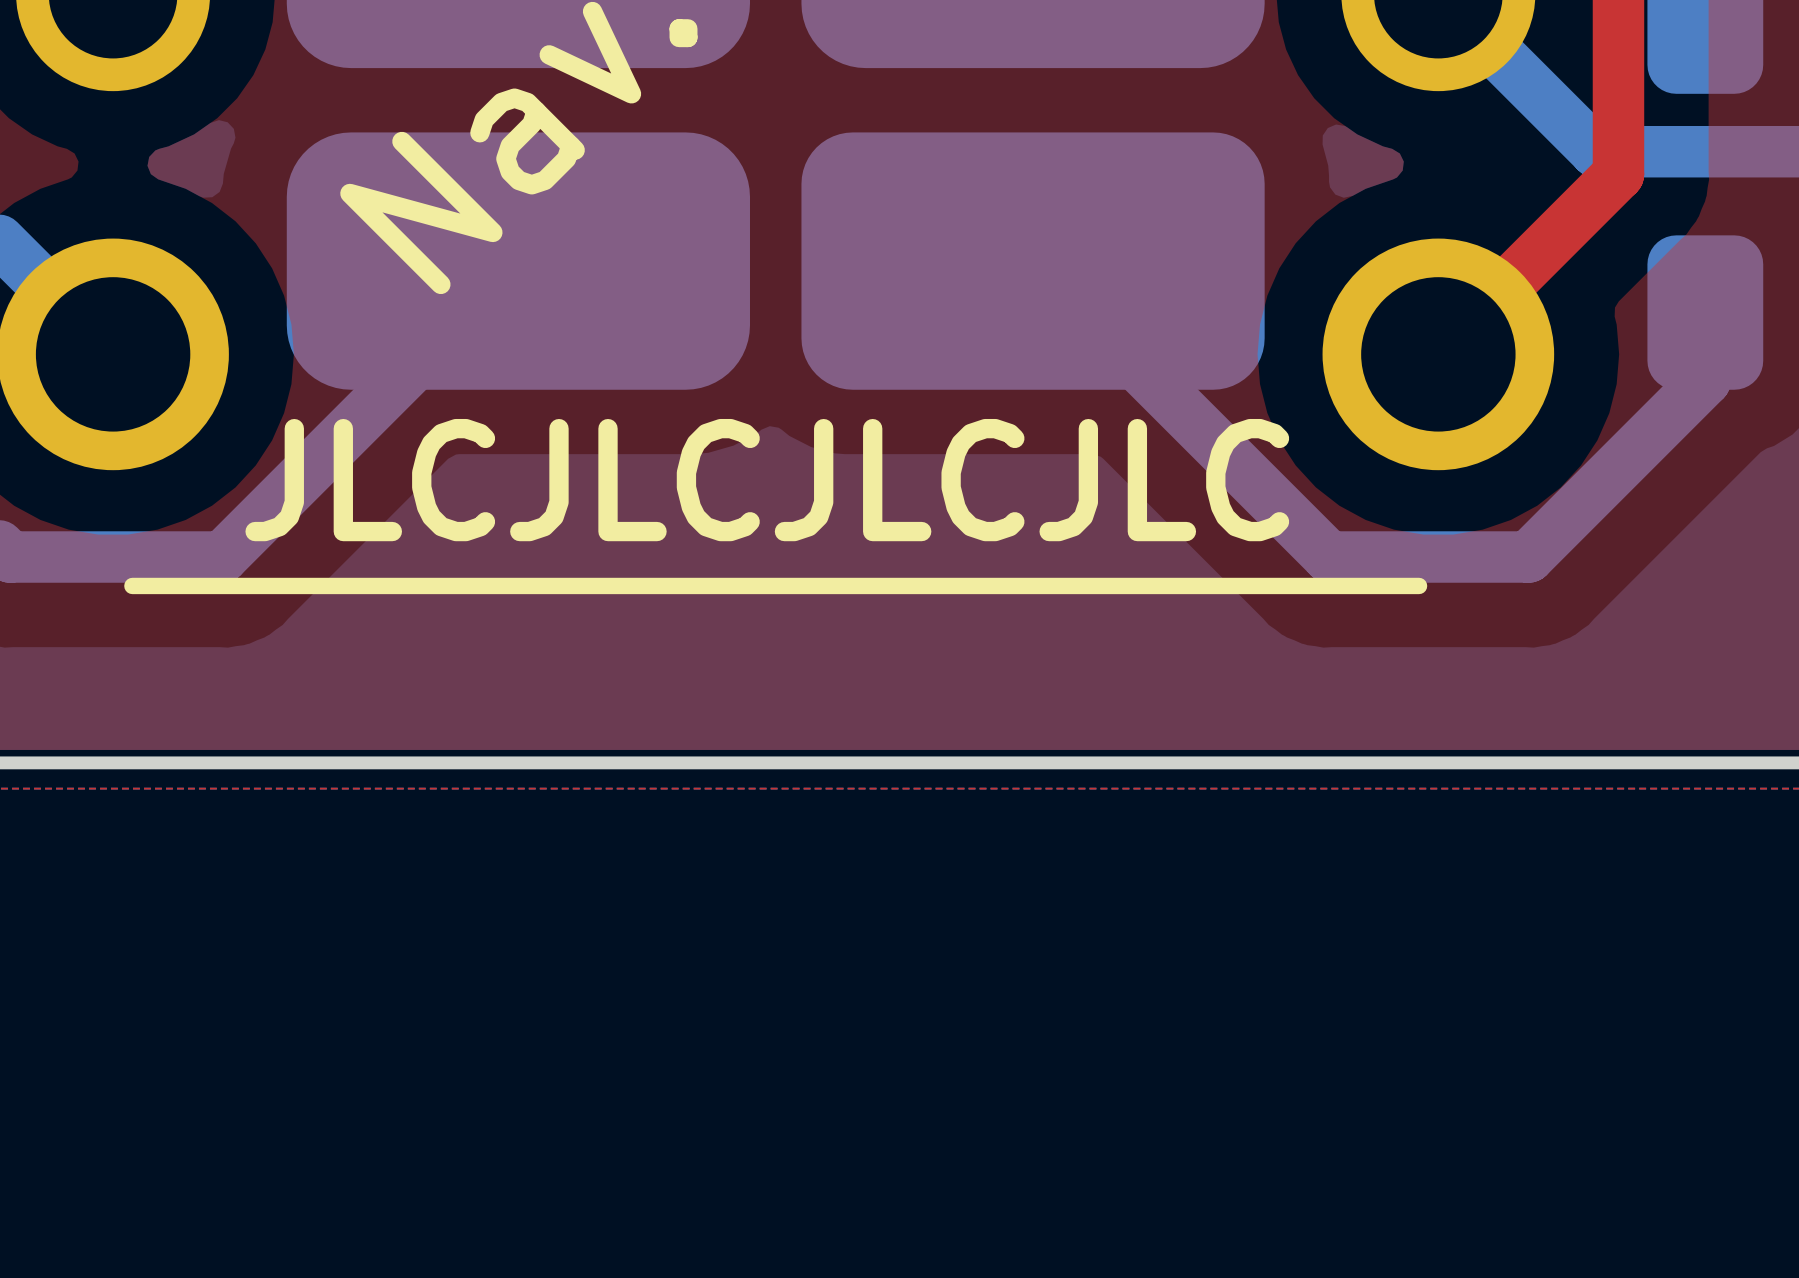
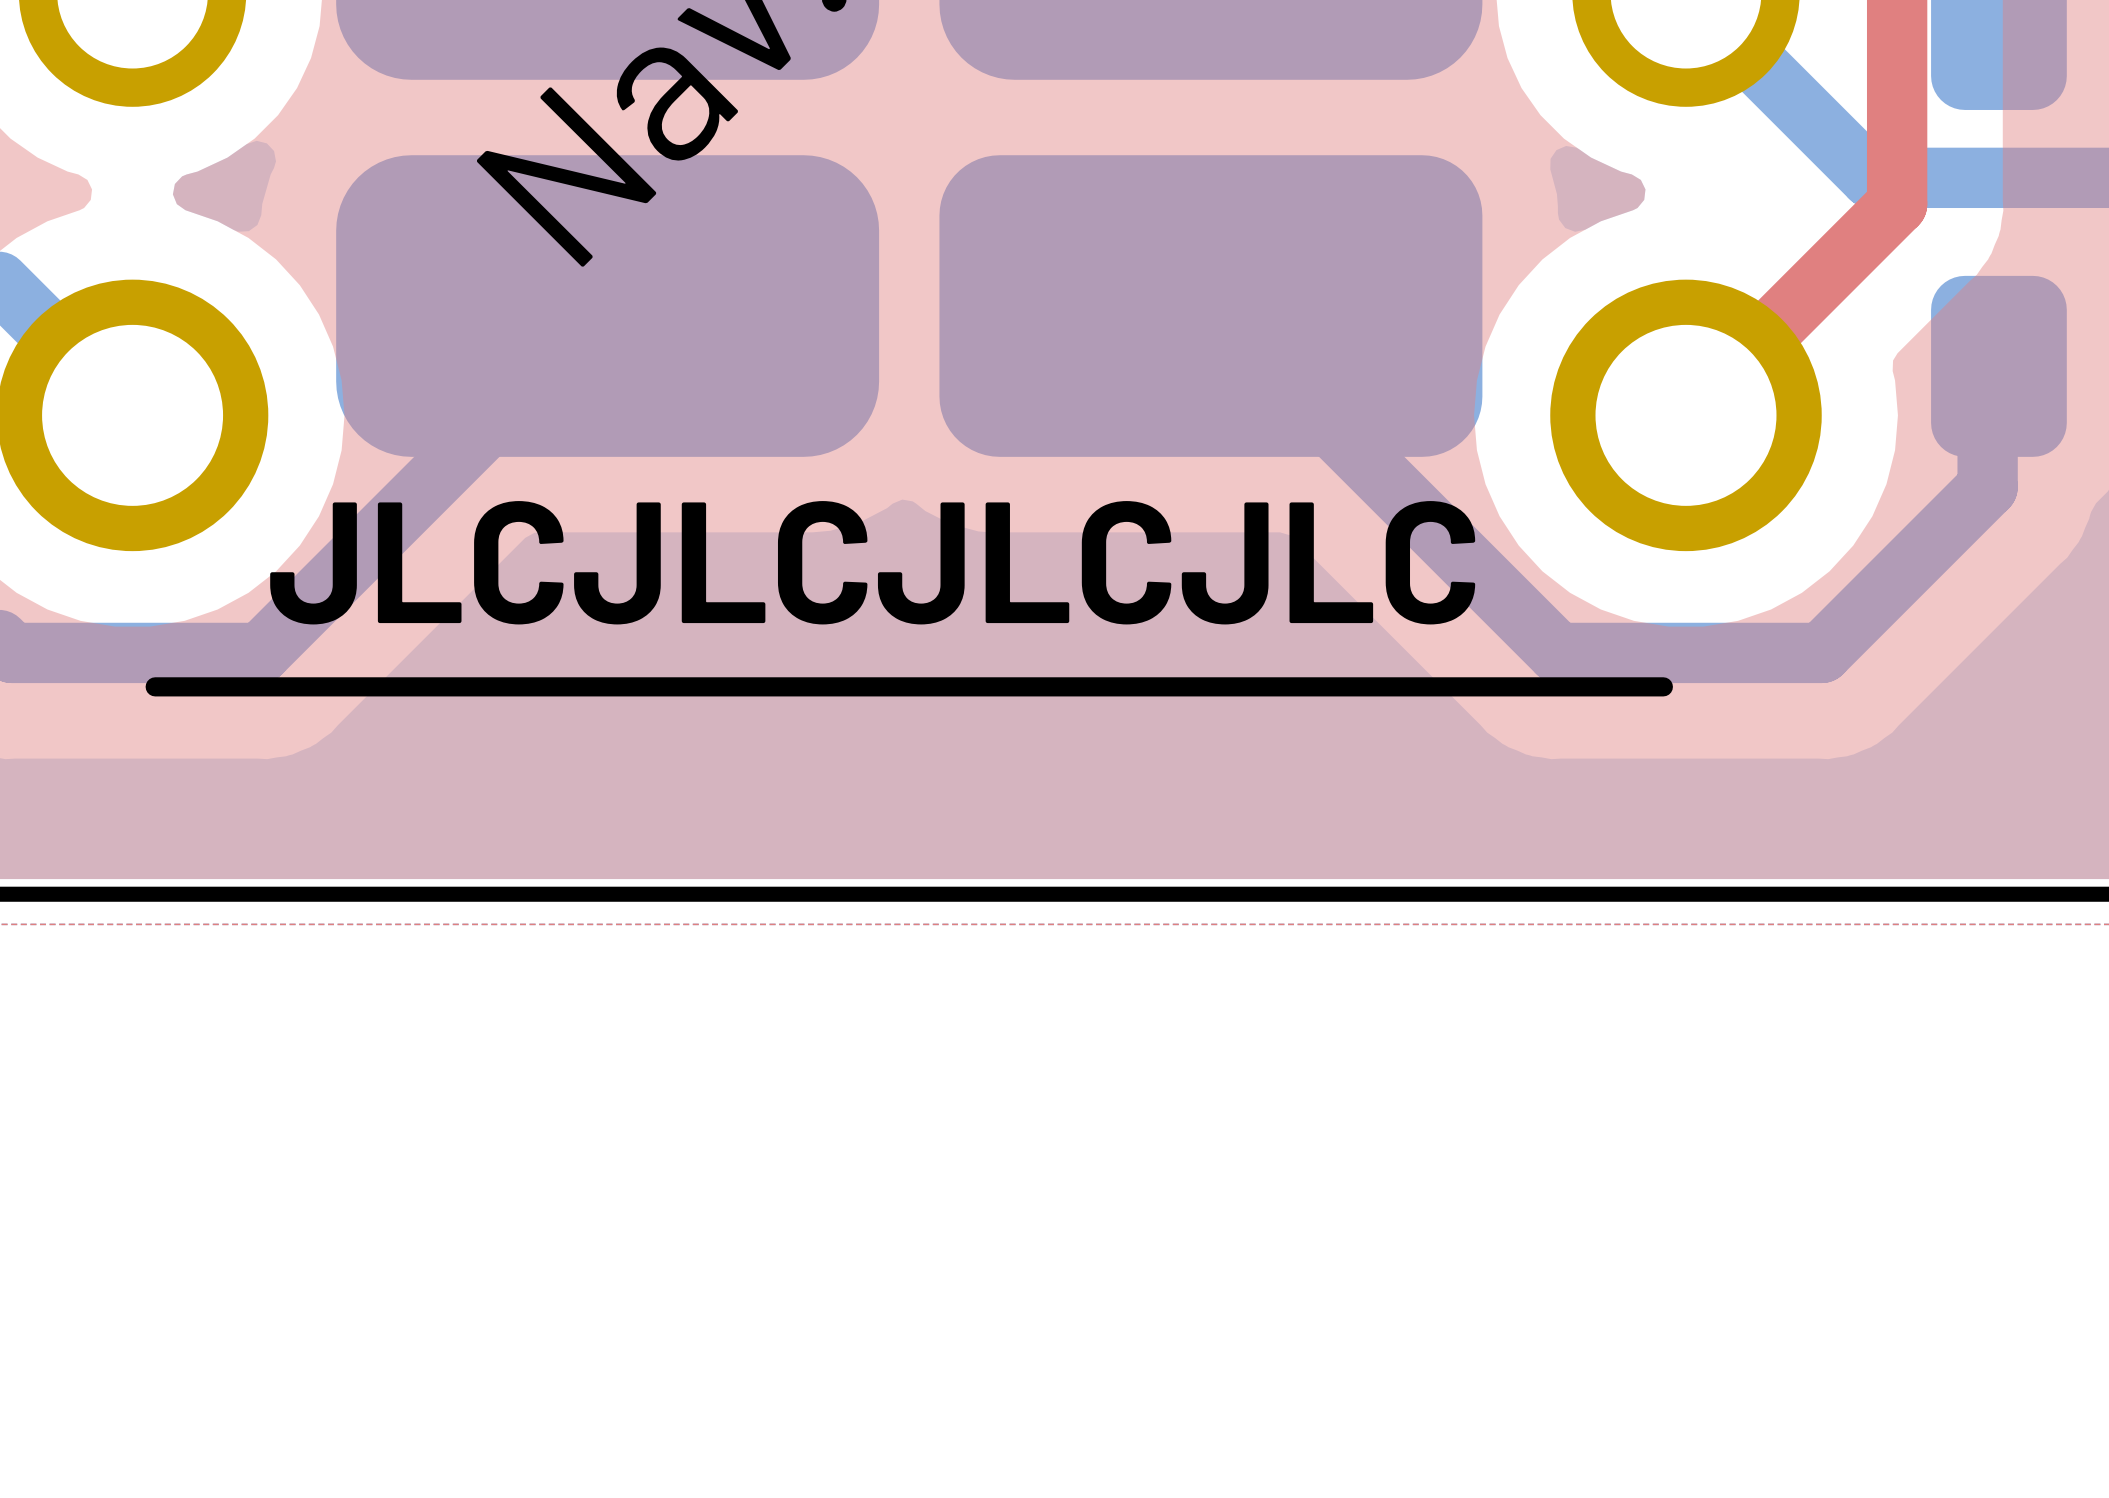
bottom track: (1705, 312) (1705, 380) (1528, 557) -> (1987, 366) (1987, 487) (1821, 652) (1791, 652)

